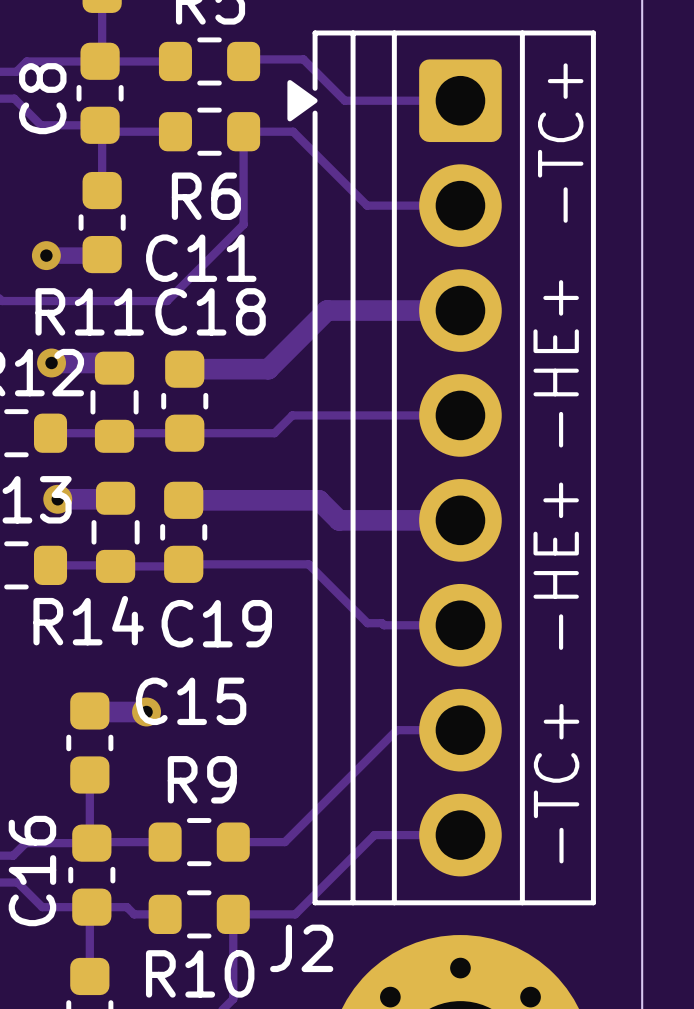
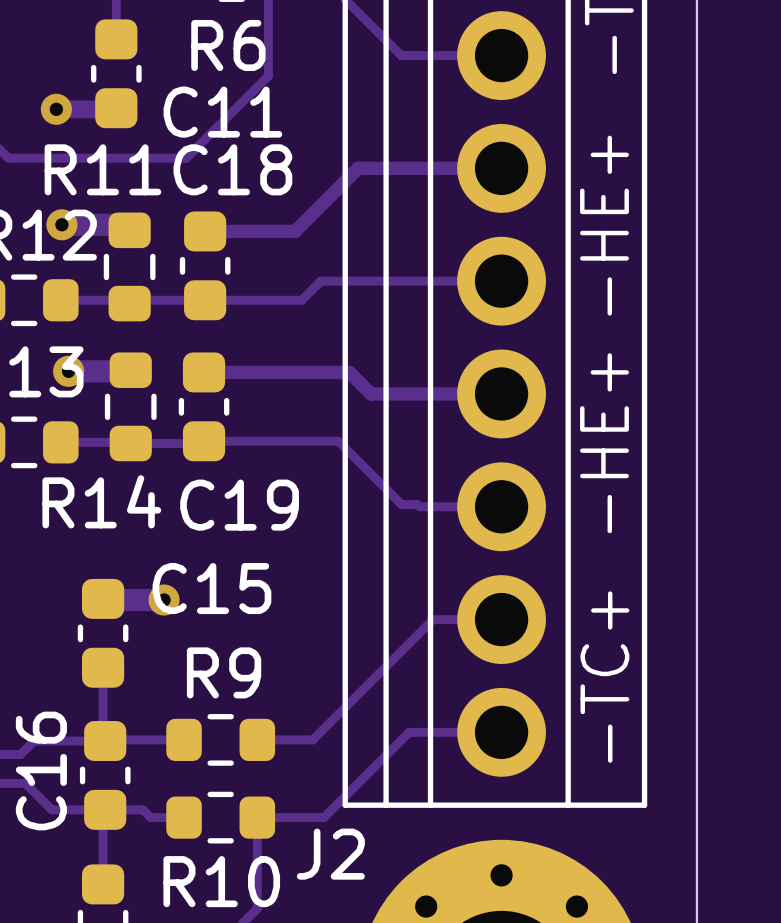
track width: thick (460, 310) (327, 310) (268, 369) (184, 369) -> thin (501, 168) (358, 168) (295, 231) (205, 231)
track width: thick (183, 500) (318, 500) (339, 520) (460, 520) -> thin (204, 372) (349, 372) (371, 393) (501, 393)

